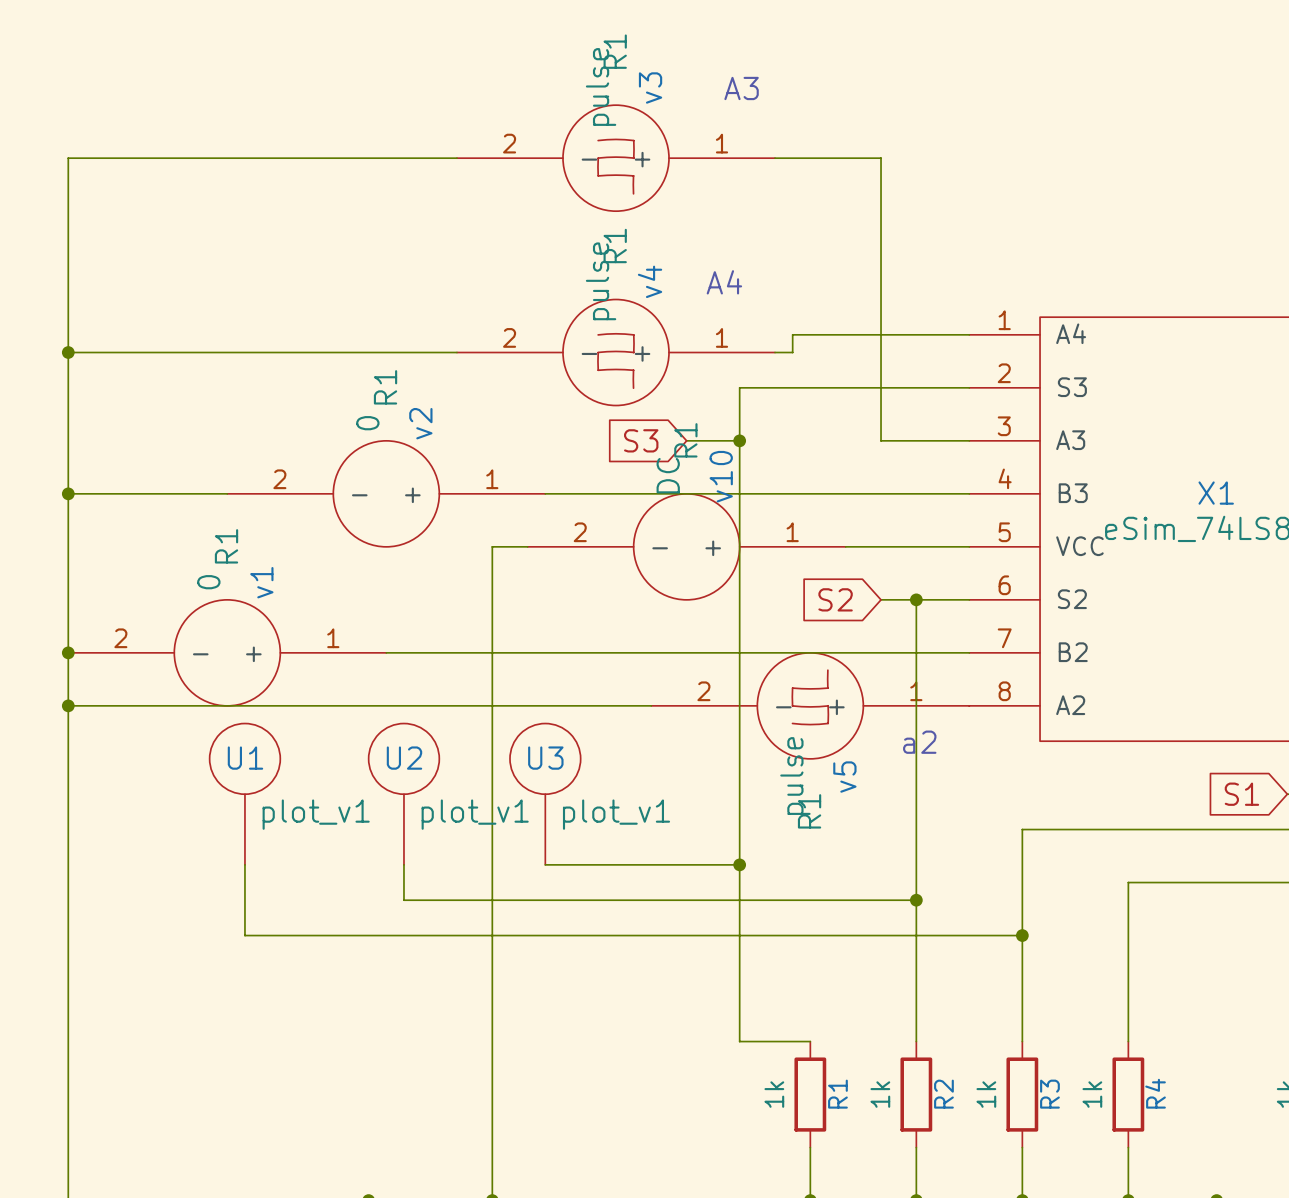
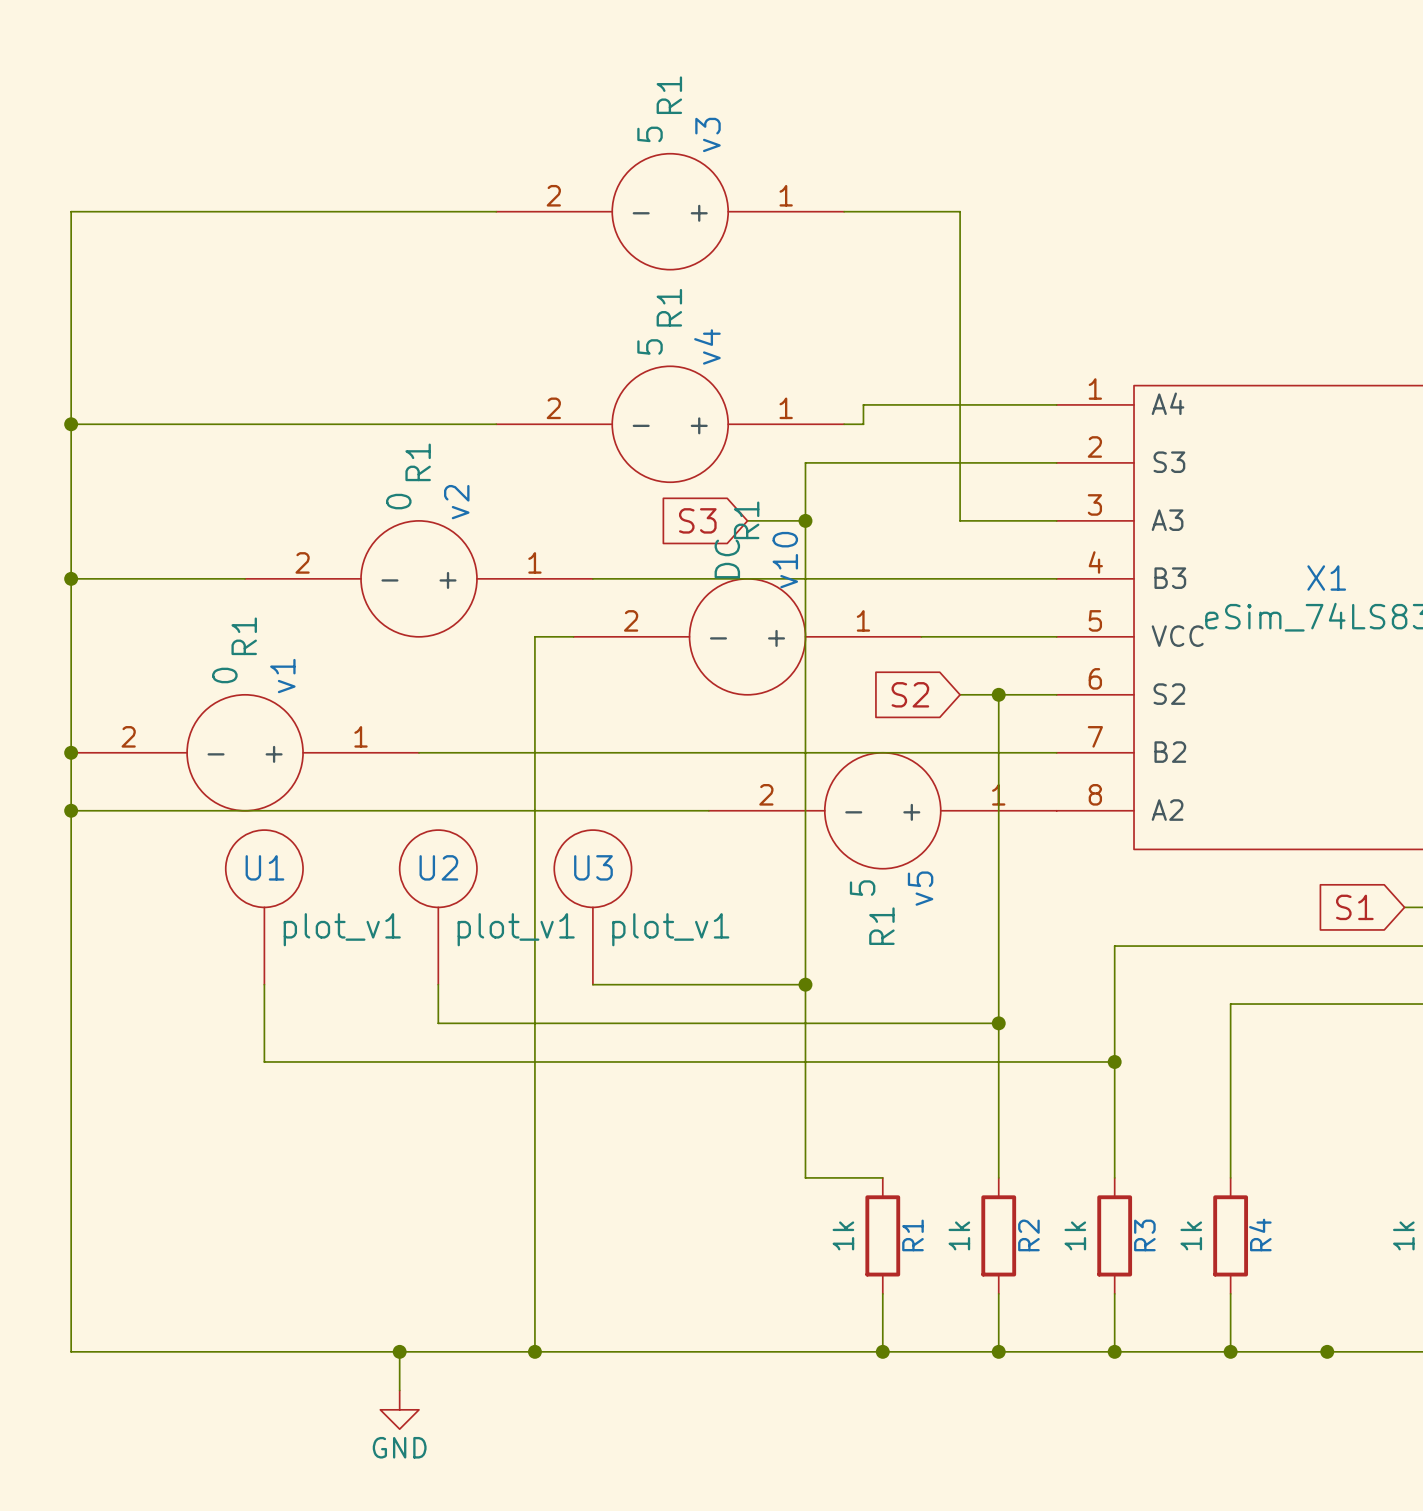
v3 value: pulse (601, 86) -> 5 (650, 134)
text: A3 (741, 88) -> none
v3 symbol: [456, 105, 776, 212] -> [496, 153, 845, 270]
v4 value: pulse (601, 281) -> 5 (650, 346)
text: A4 (724, 282) -> none
v4 symbol: [456, 299, 776, 406] -> [496, 366, 845, 483]
v5 symbol: [651, 652, 970, 759] -> [708, 752, 1057, 869]
text: a2 (919, 742) -> none
v5 value: pulse (795, 776) -> 5 (862, 888)

